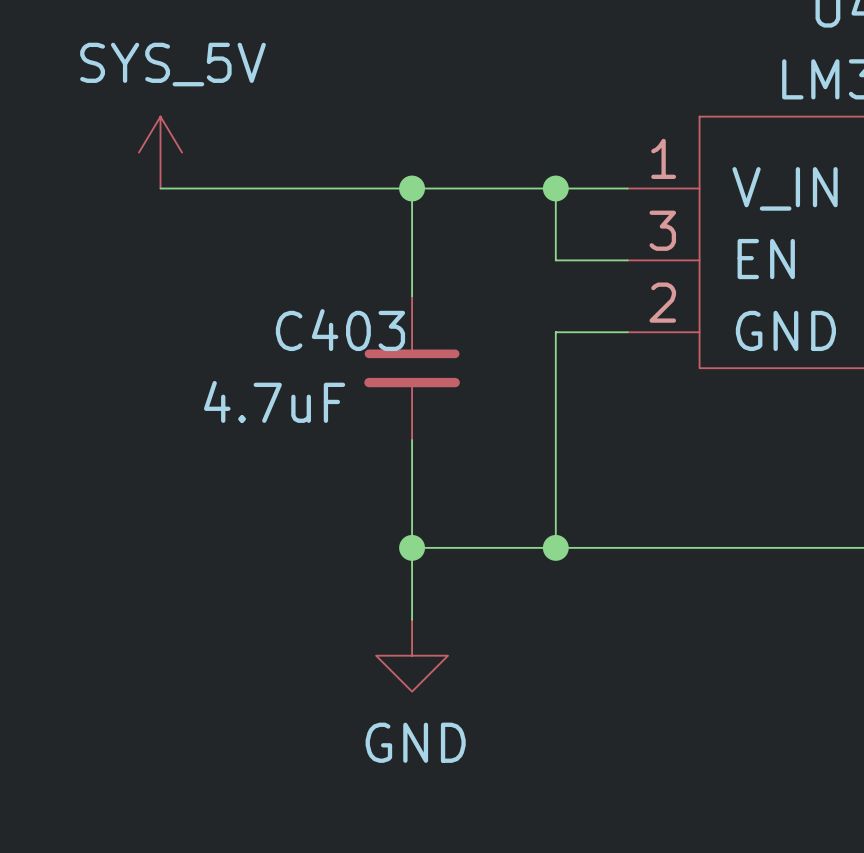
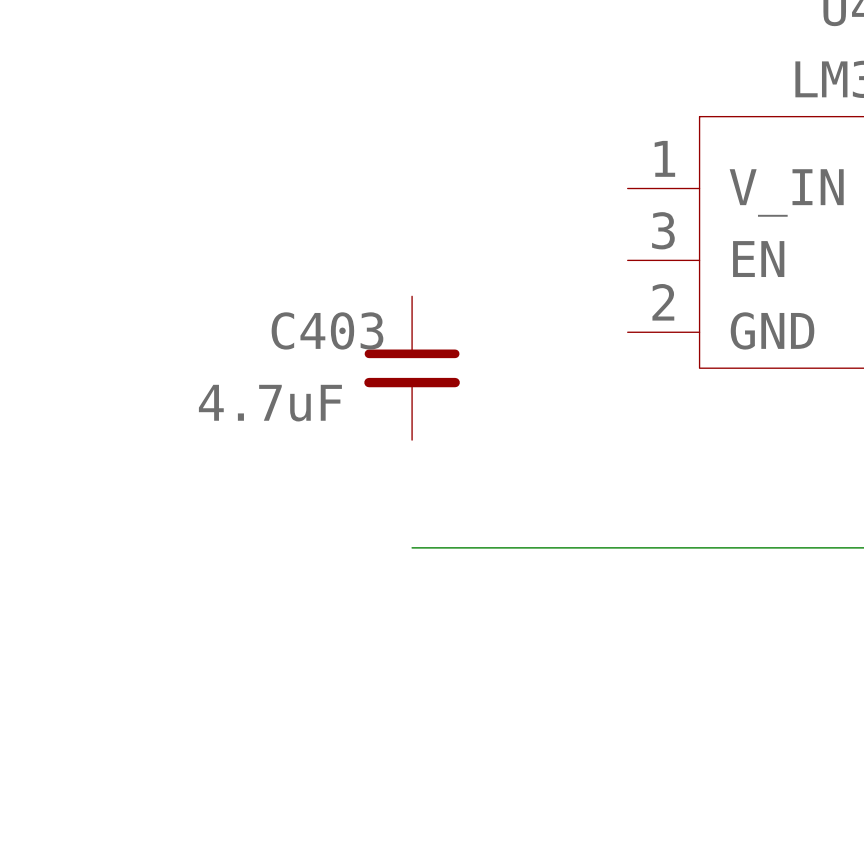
power symbol: SYS_5V (160, 152) -> none
wire: (160, 188) (627, 188) -> none
wire: (412, 188) (412, 296) -> none
junction: (412, 188) -> none
wire: (555, 188) (555, 260) (627, 260) -> none
junction: (555, 188) -> none
wire: (627, 332) (555, 332) (555, 547) -> none
wire: (412, 440) (412, 619) -> none
junction: (412, 547) -> none
junction: (555, 547) -> none
power symbol: GND (412, 655) -> none

